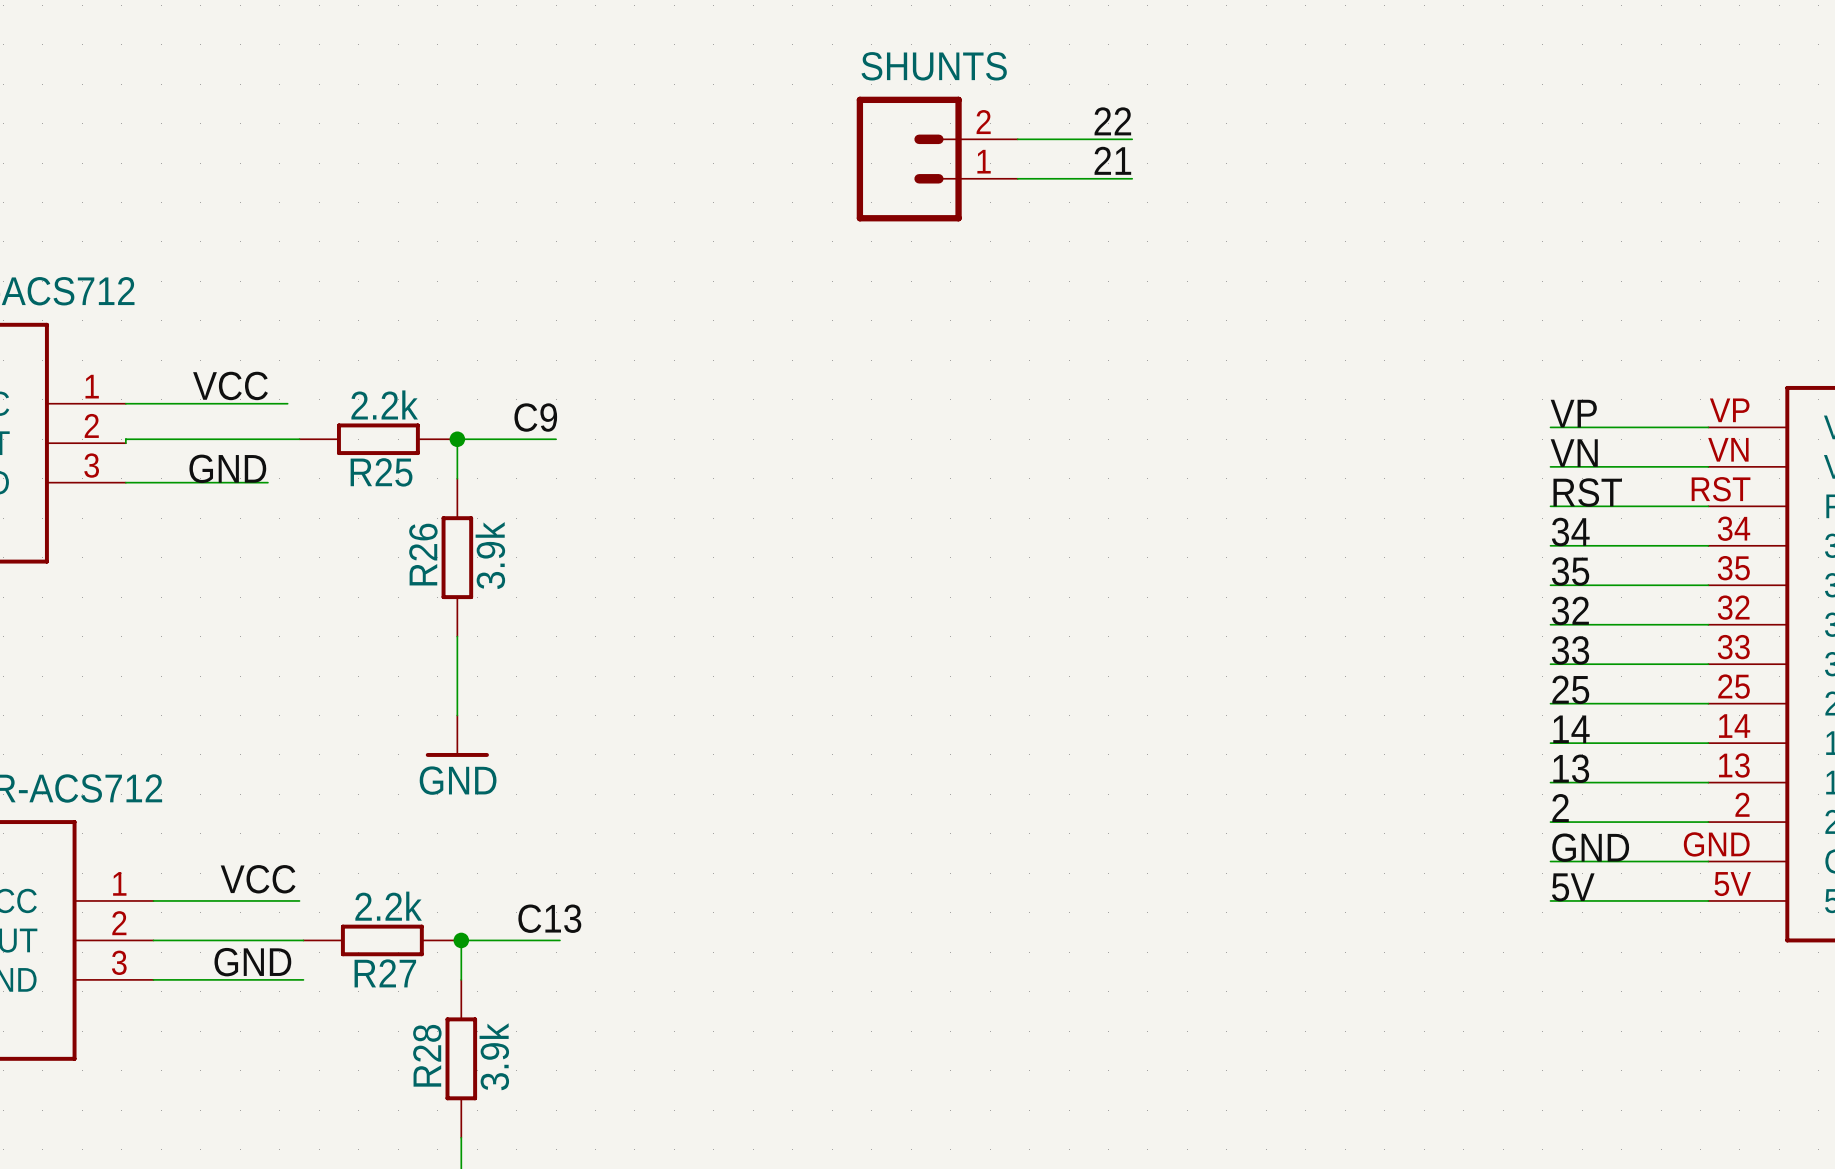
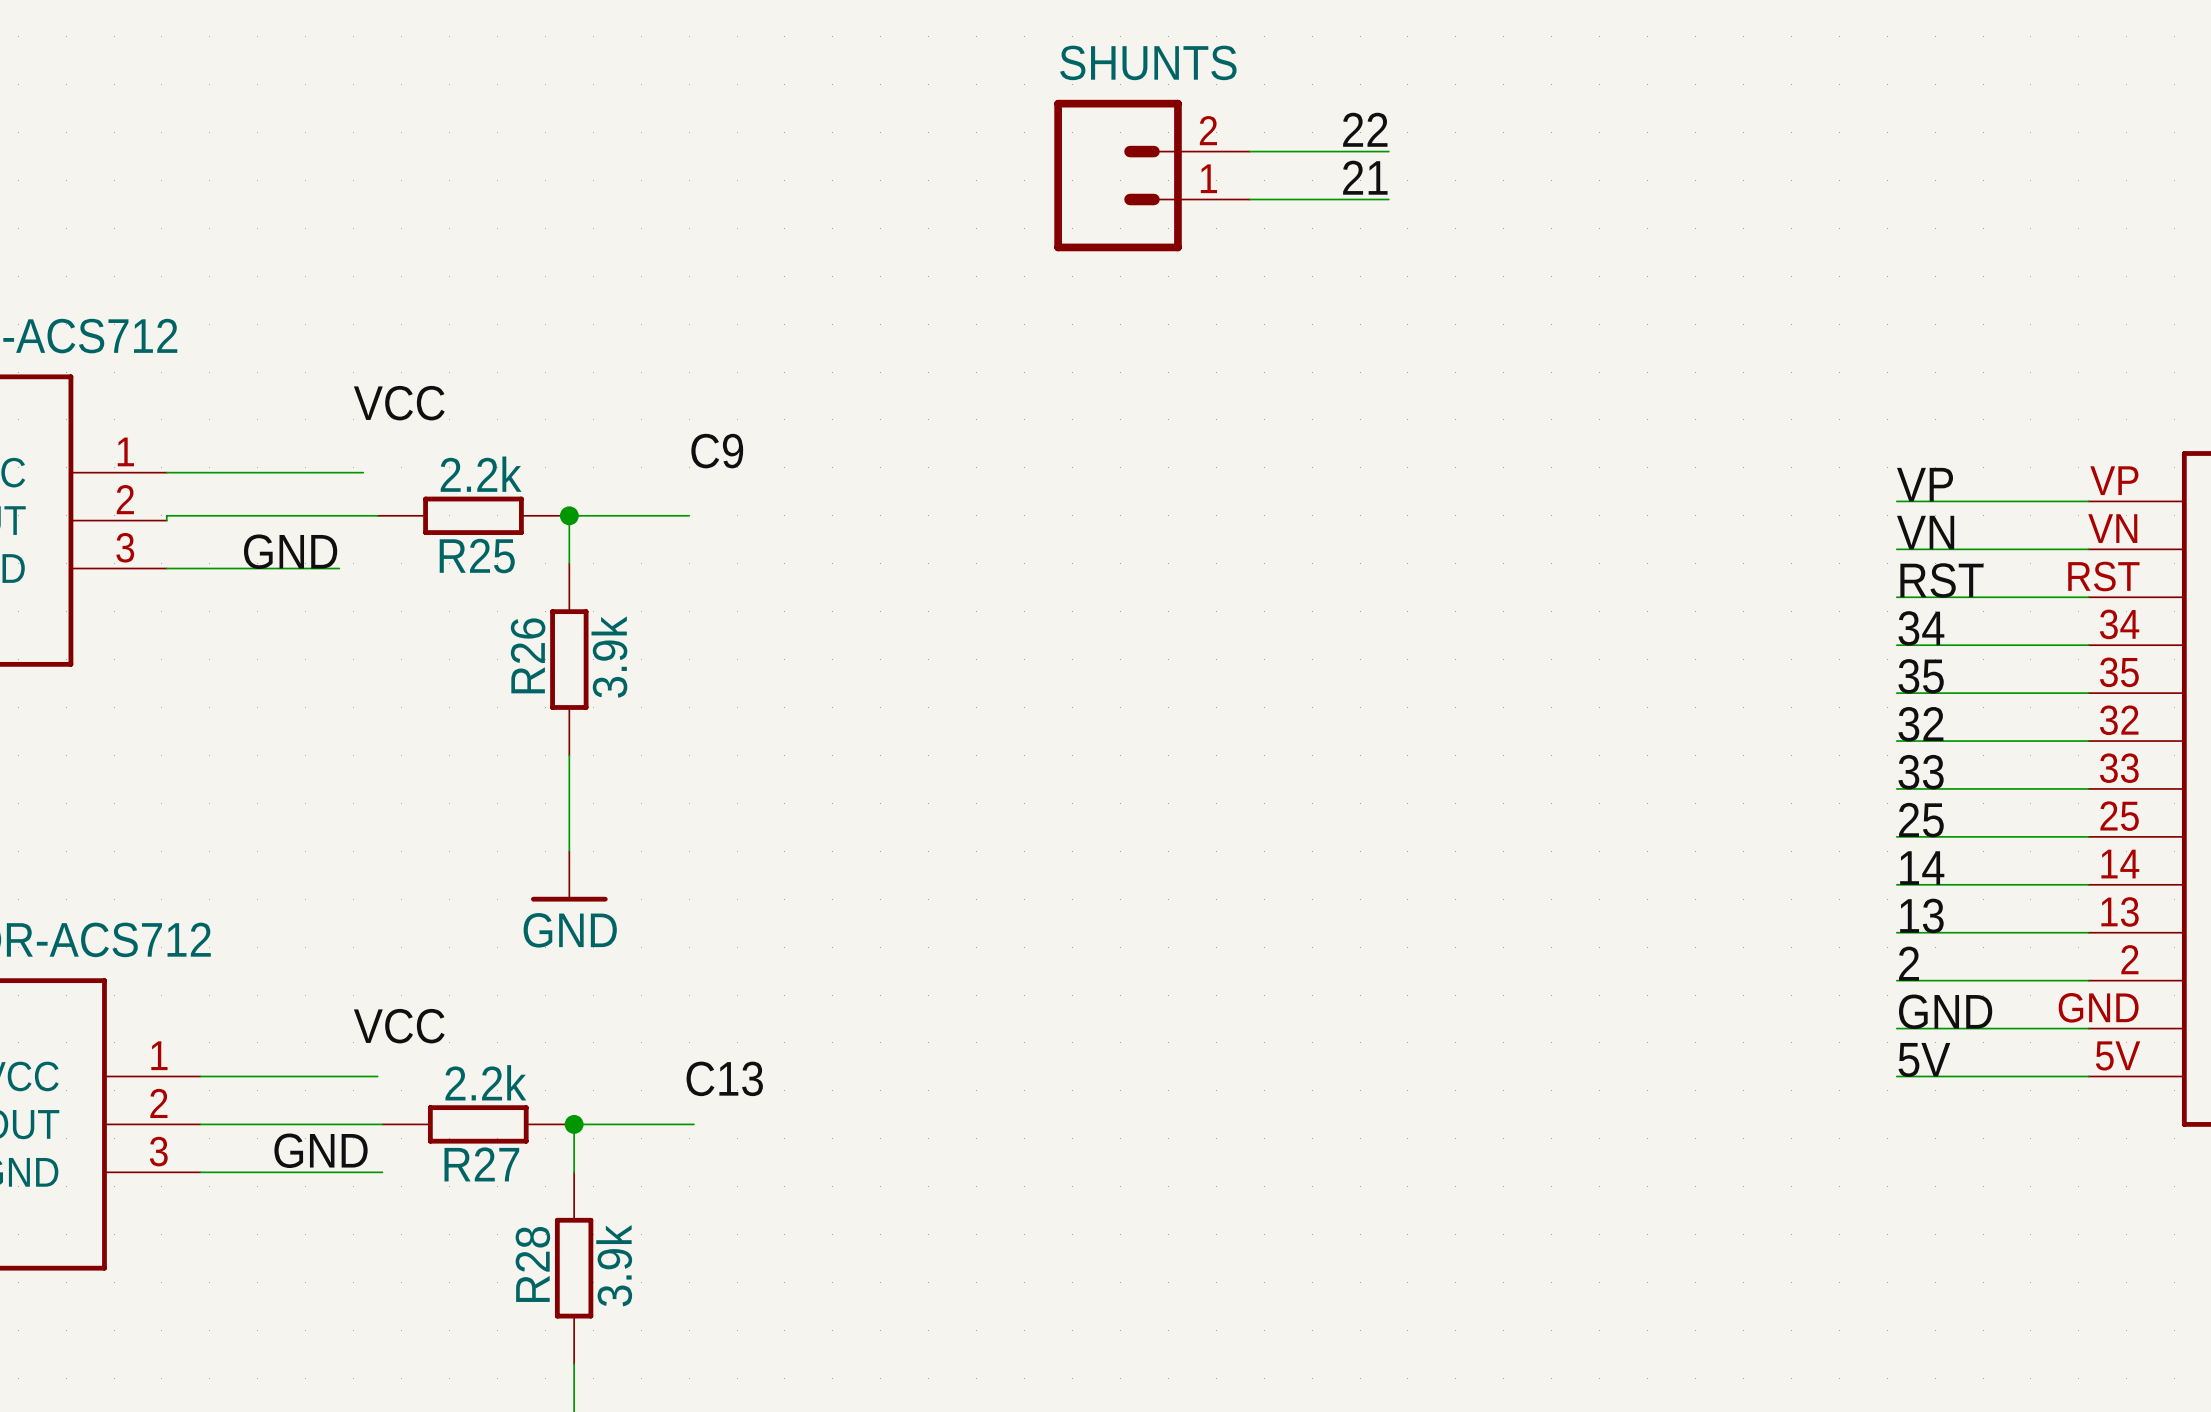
label position: VCC (230, 385) -> VCC (399, 403)
label position: C9 (535, 417) -> C9 (717, 451)
label position: VCC (258, 879) -> VCC (399, 1026)
label position: C13 (549, 918) -> C13 (724, 1078)

